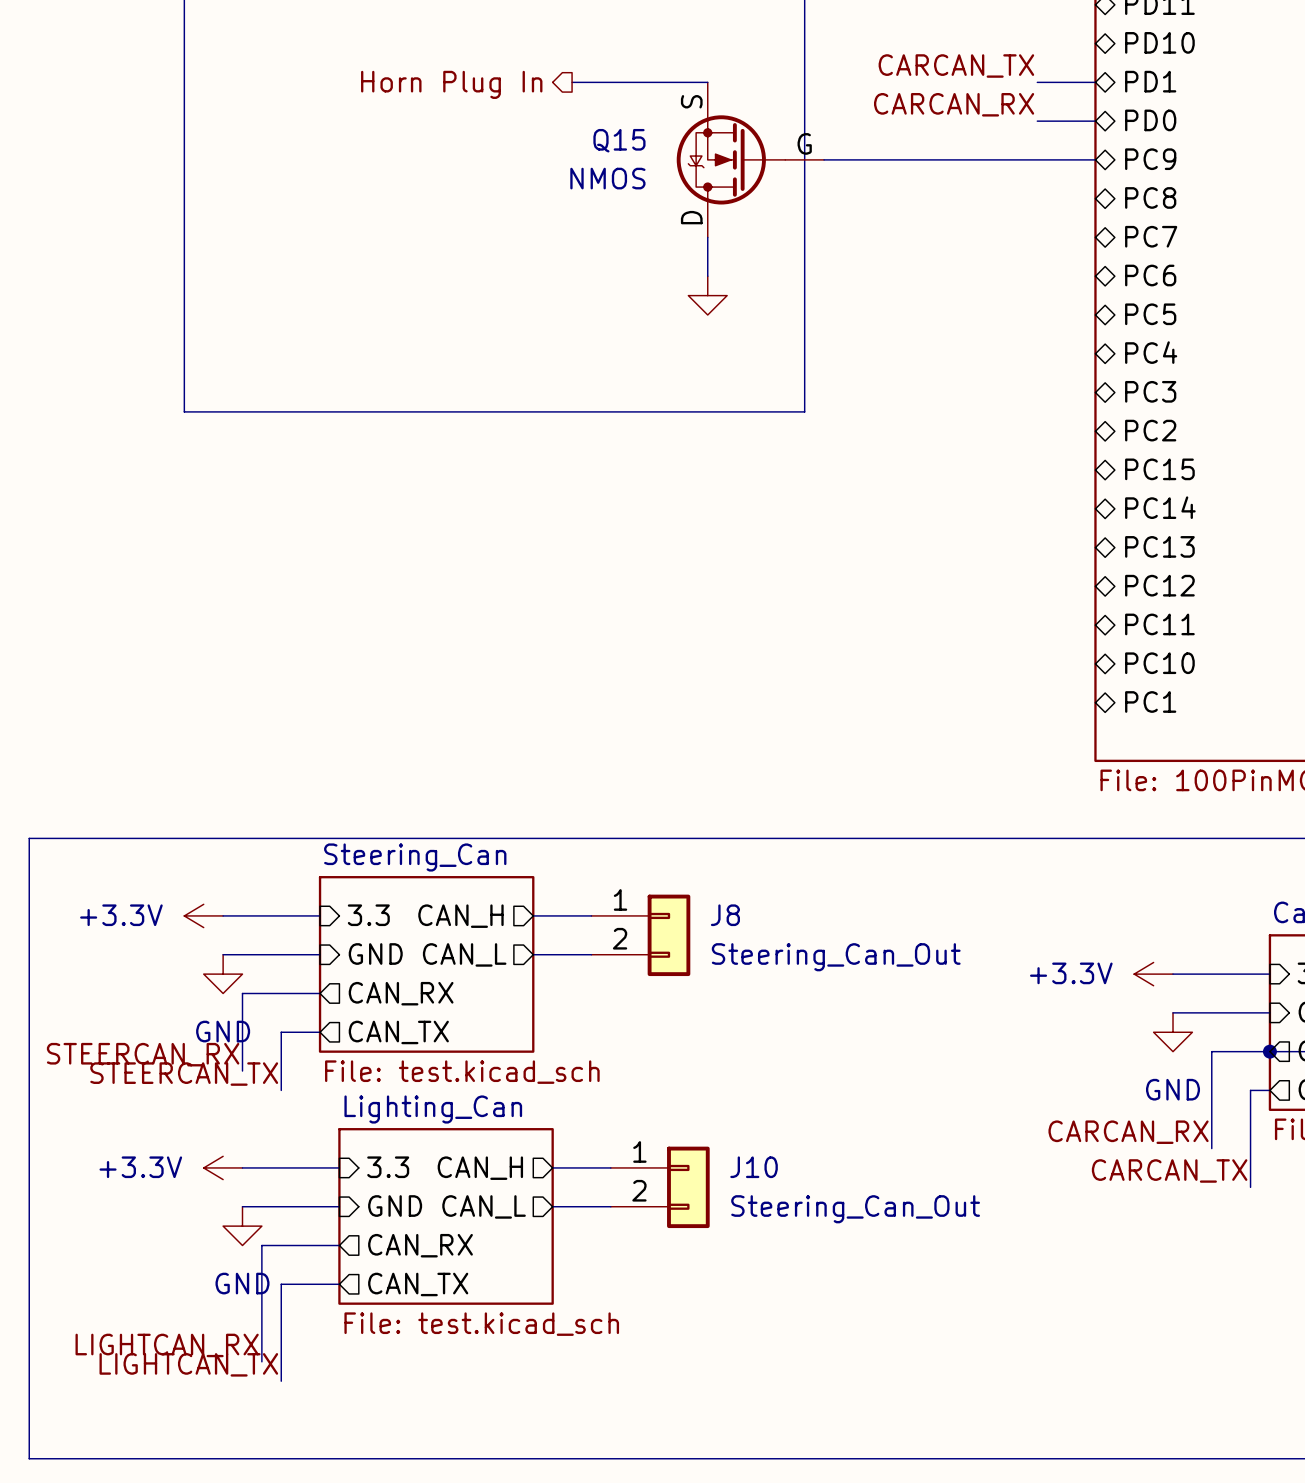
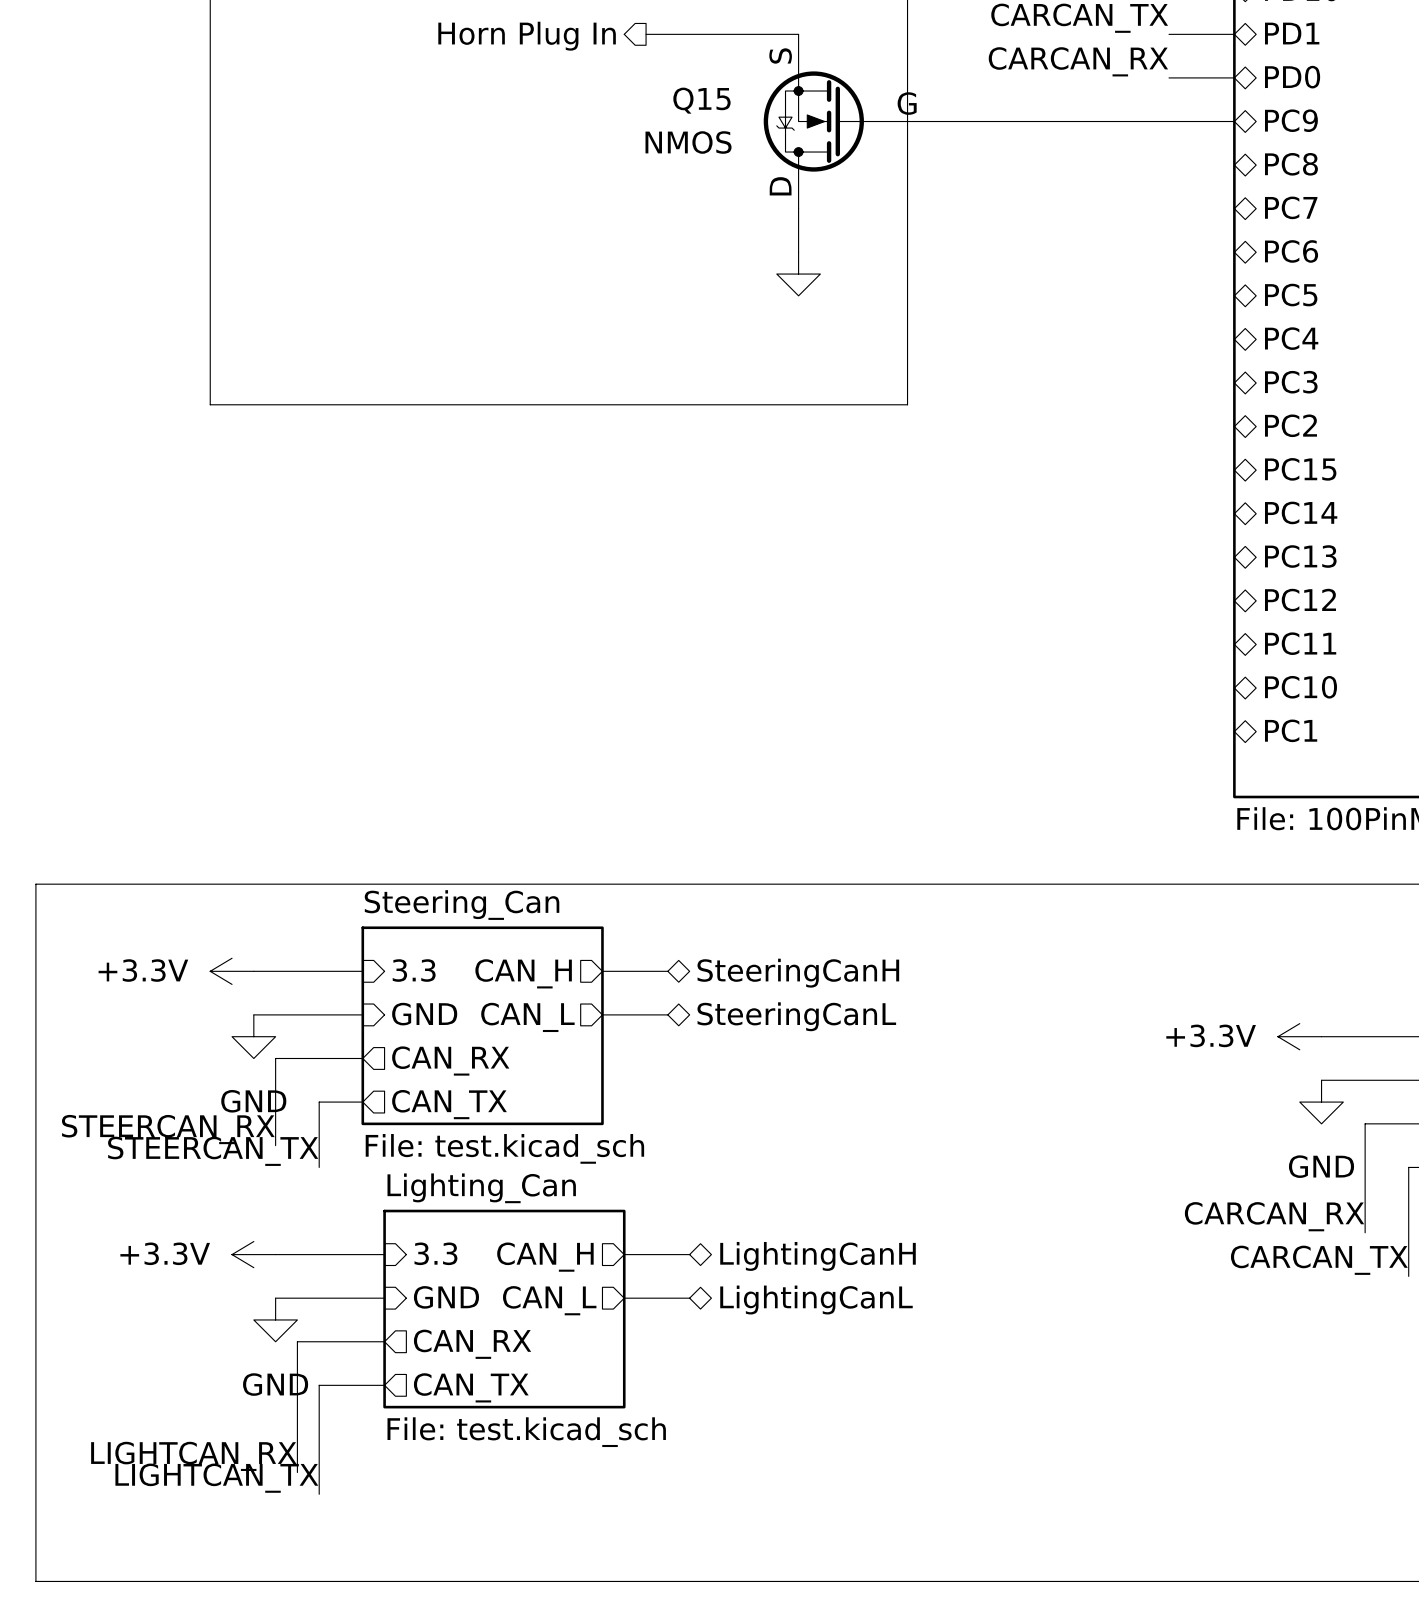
hierarchical label: none -> SteeringCanH (798, 973)
J8: Steering_Can_Out (640, 935) -> none
hierarchical label: none -> SteeringCanL (796, 1016)
hierarchical label: none -> LightingCanH (818, 1256)
J10: Steering_Can_Out (660, 1187) -> none
hierarchical label: none -> LightingCanL (816, 1300)

